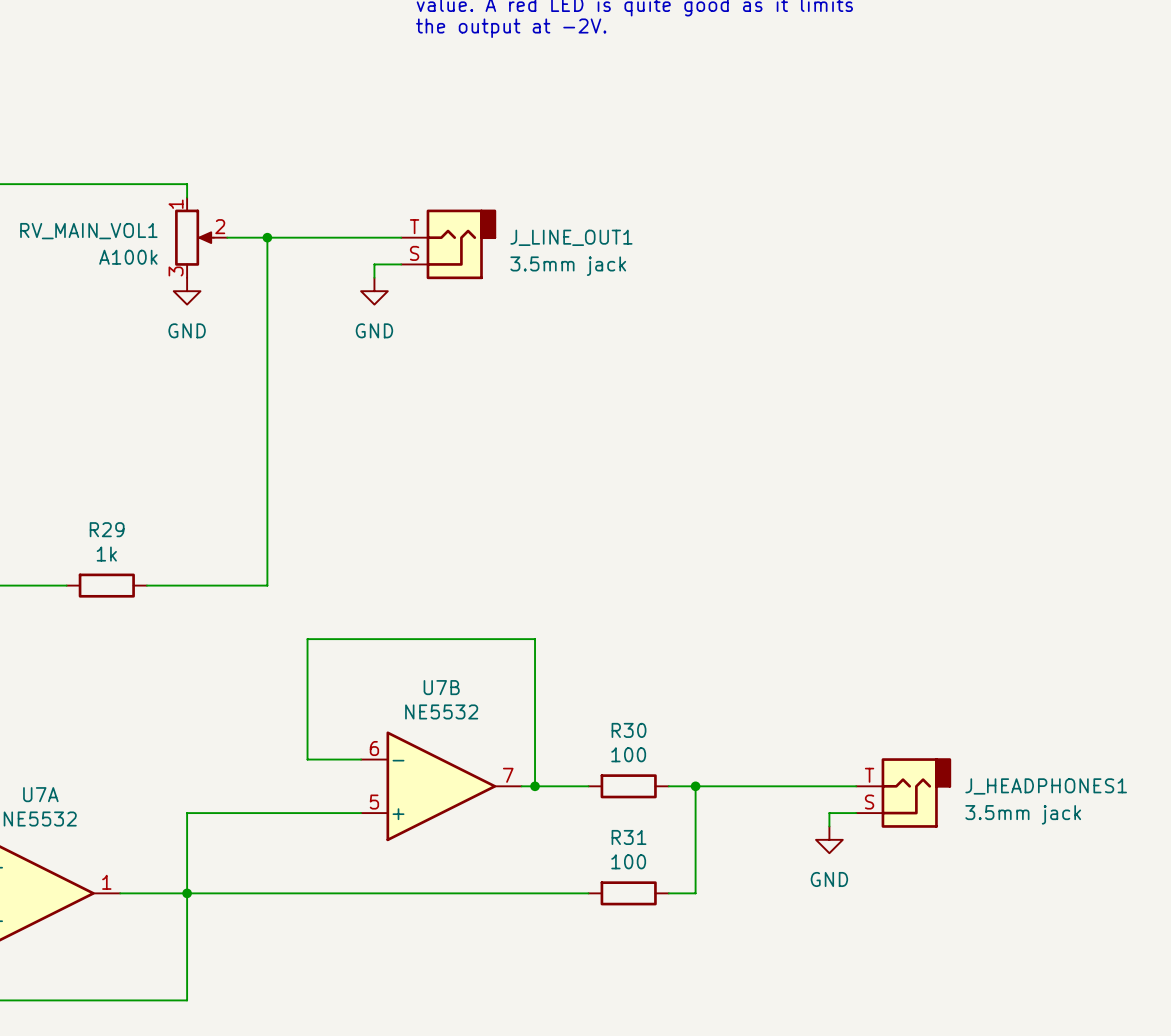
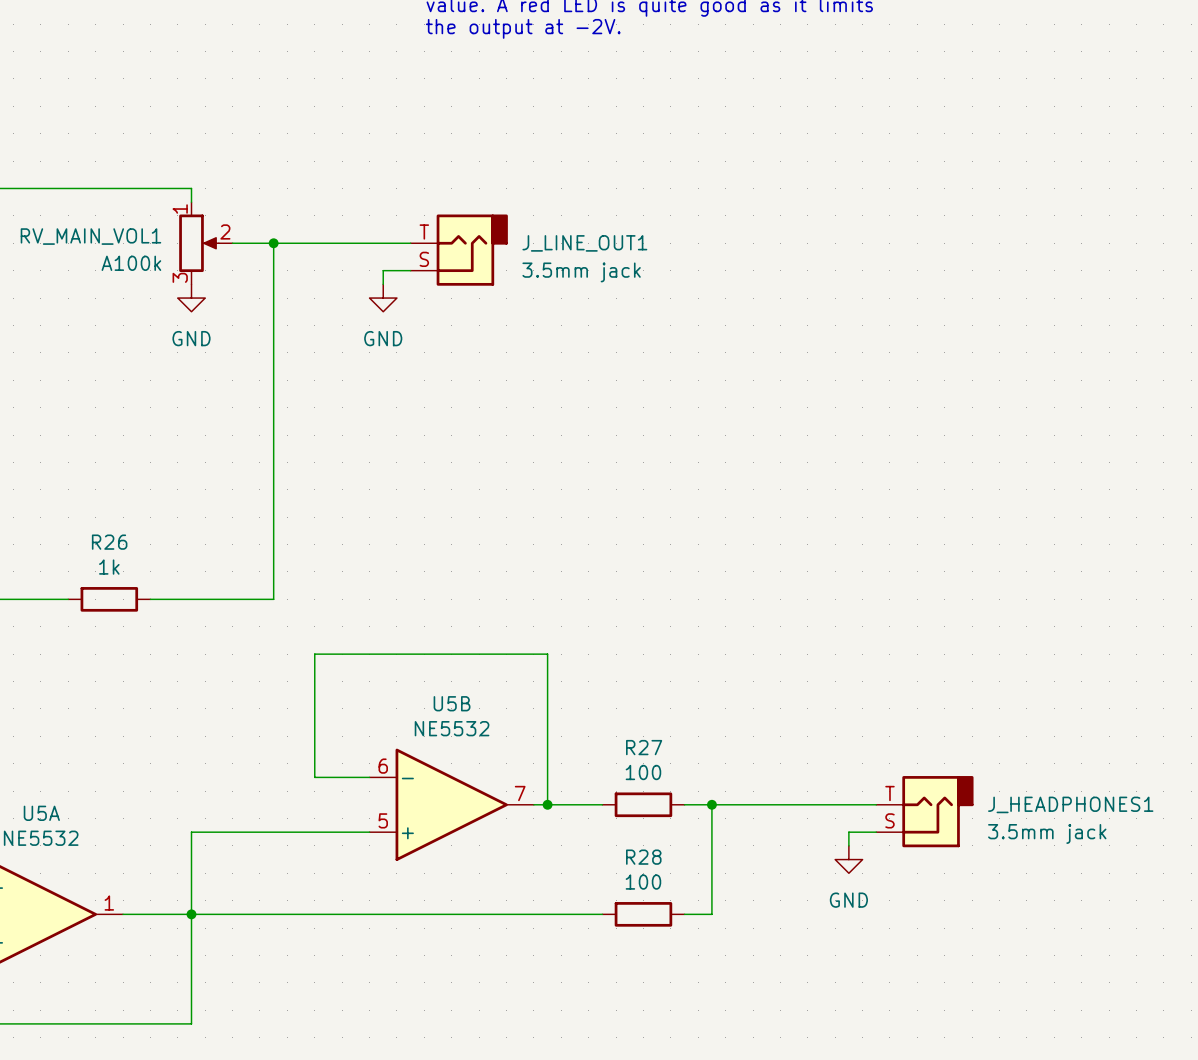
R29 name: R29 (107, 529) -> R26 (109, 542)
U7B name: U7B (441, 687) -> U5B (452, 703)
R30 name: R30 (629, 730) -> R27 (644, 747)
U7A name: U7A (40, 794) -> U5A (41, 813)
R31 name: R31 (629, 837) -> R28 (643, 857)

